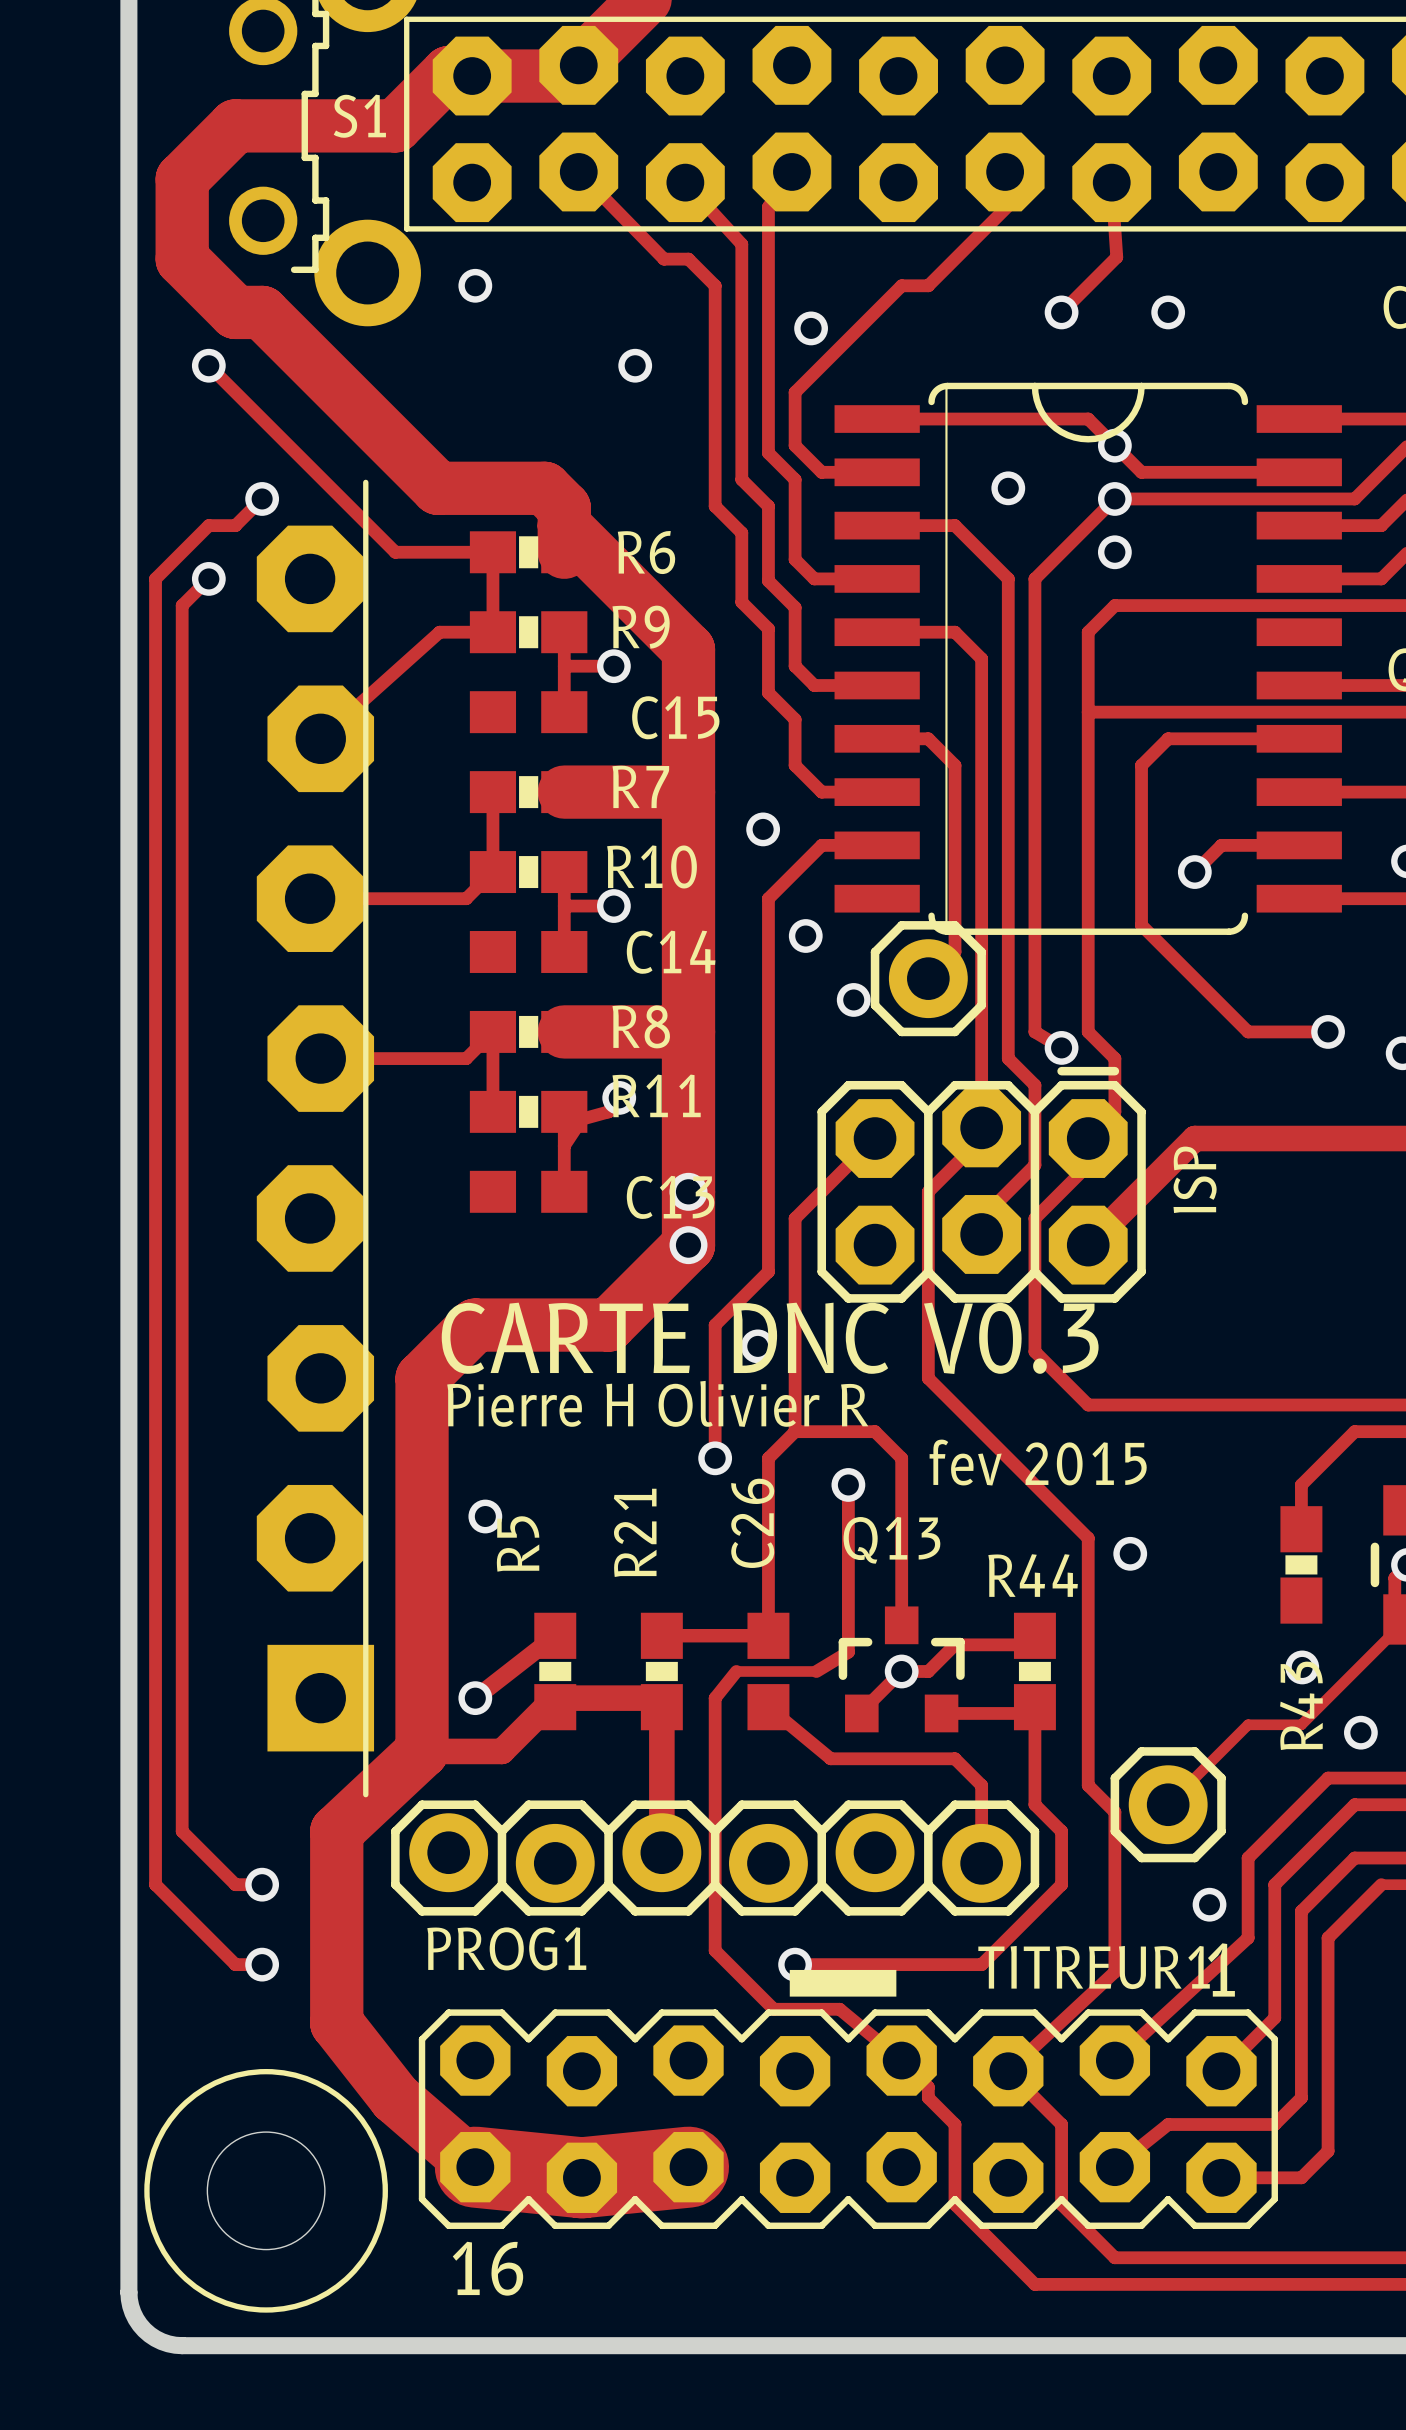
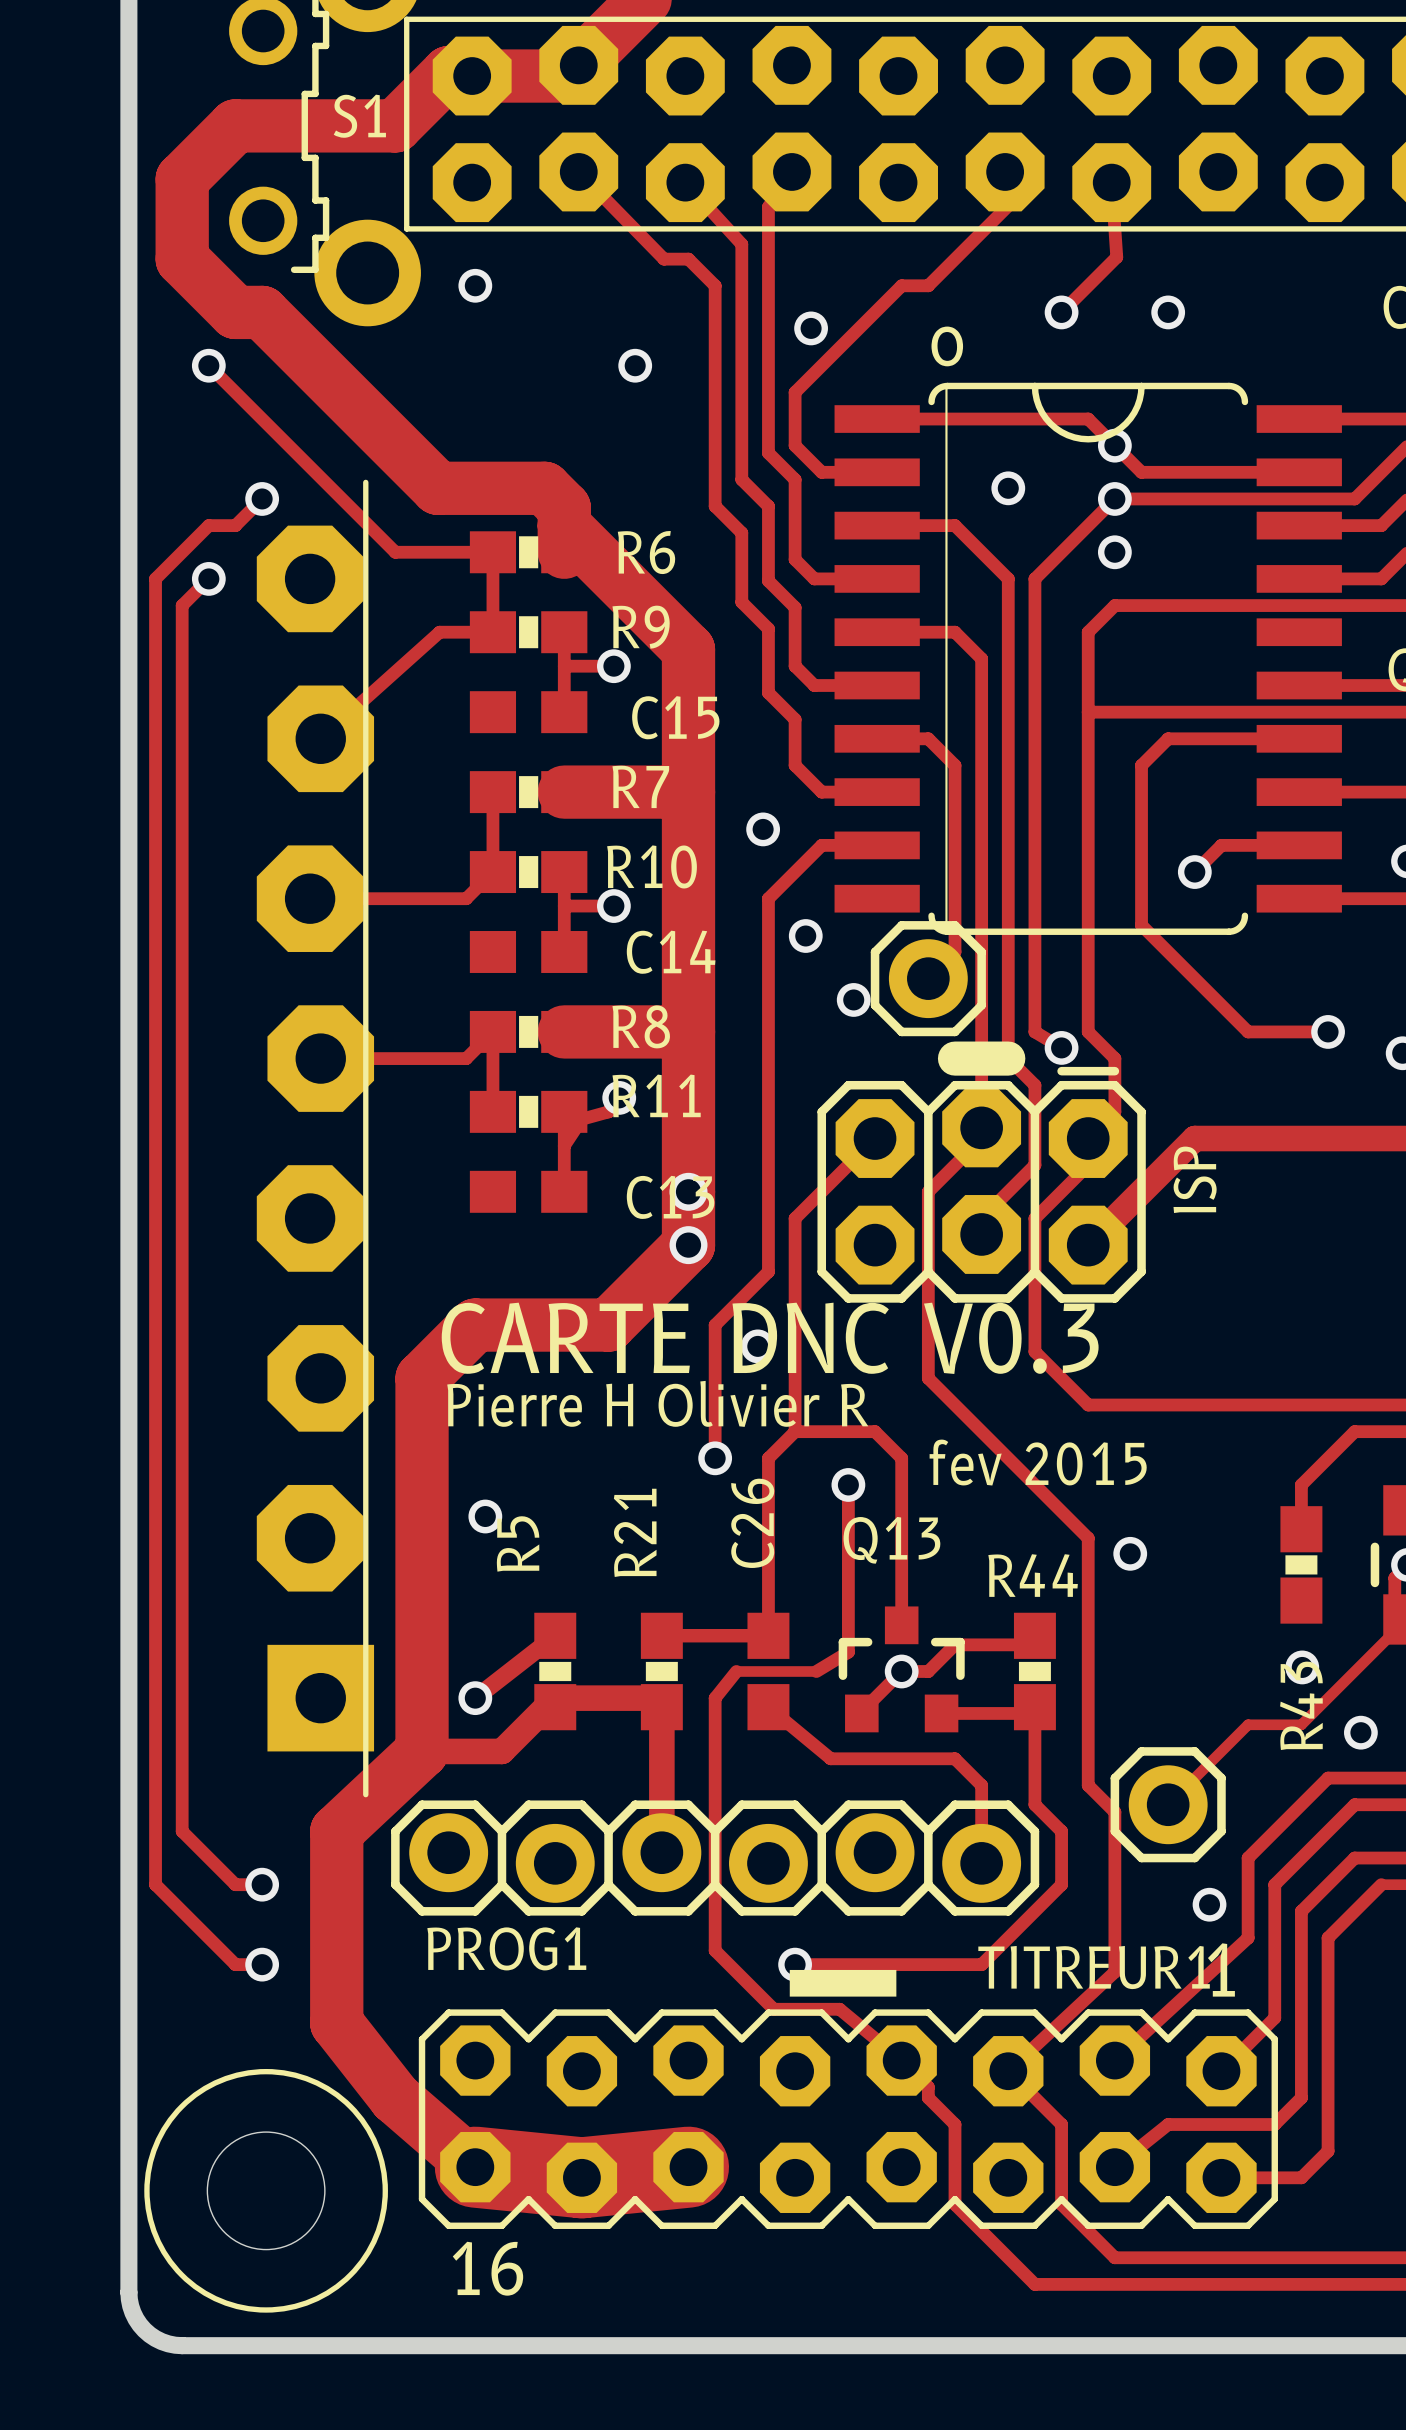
text: none -> o (947, 346)
ISP footprint: [817, 1066, 1146, 1303] -> [817, 1041, 1146, 1303]

